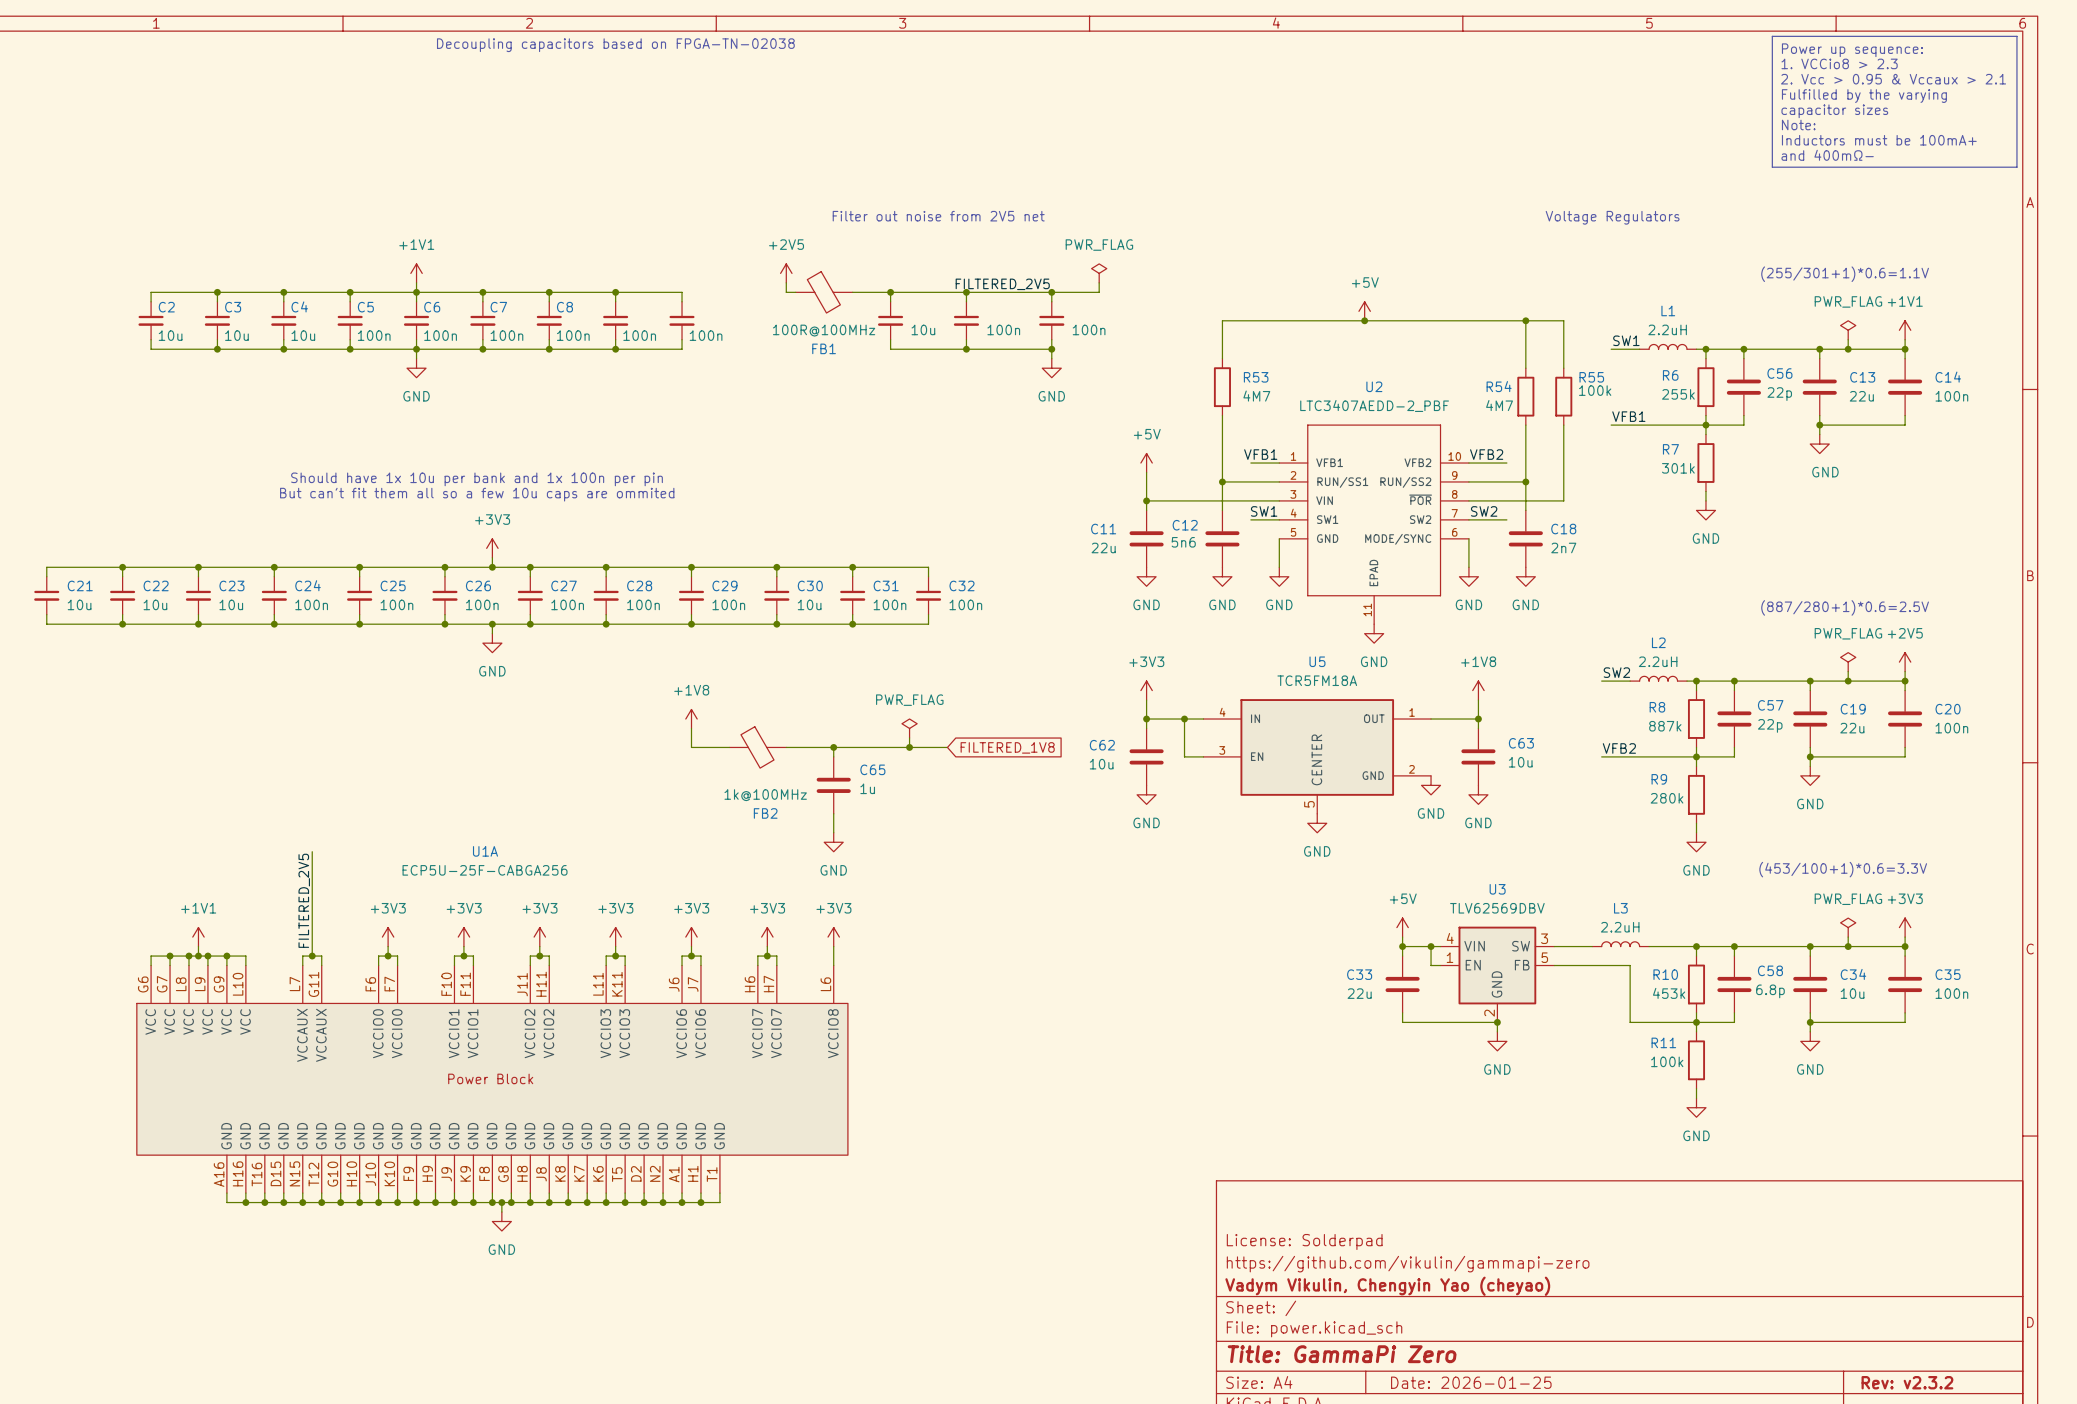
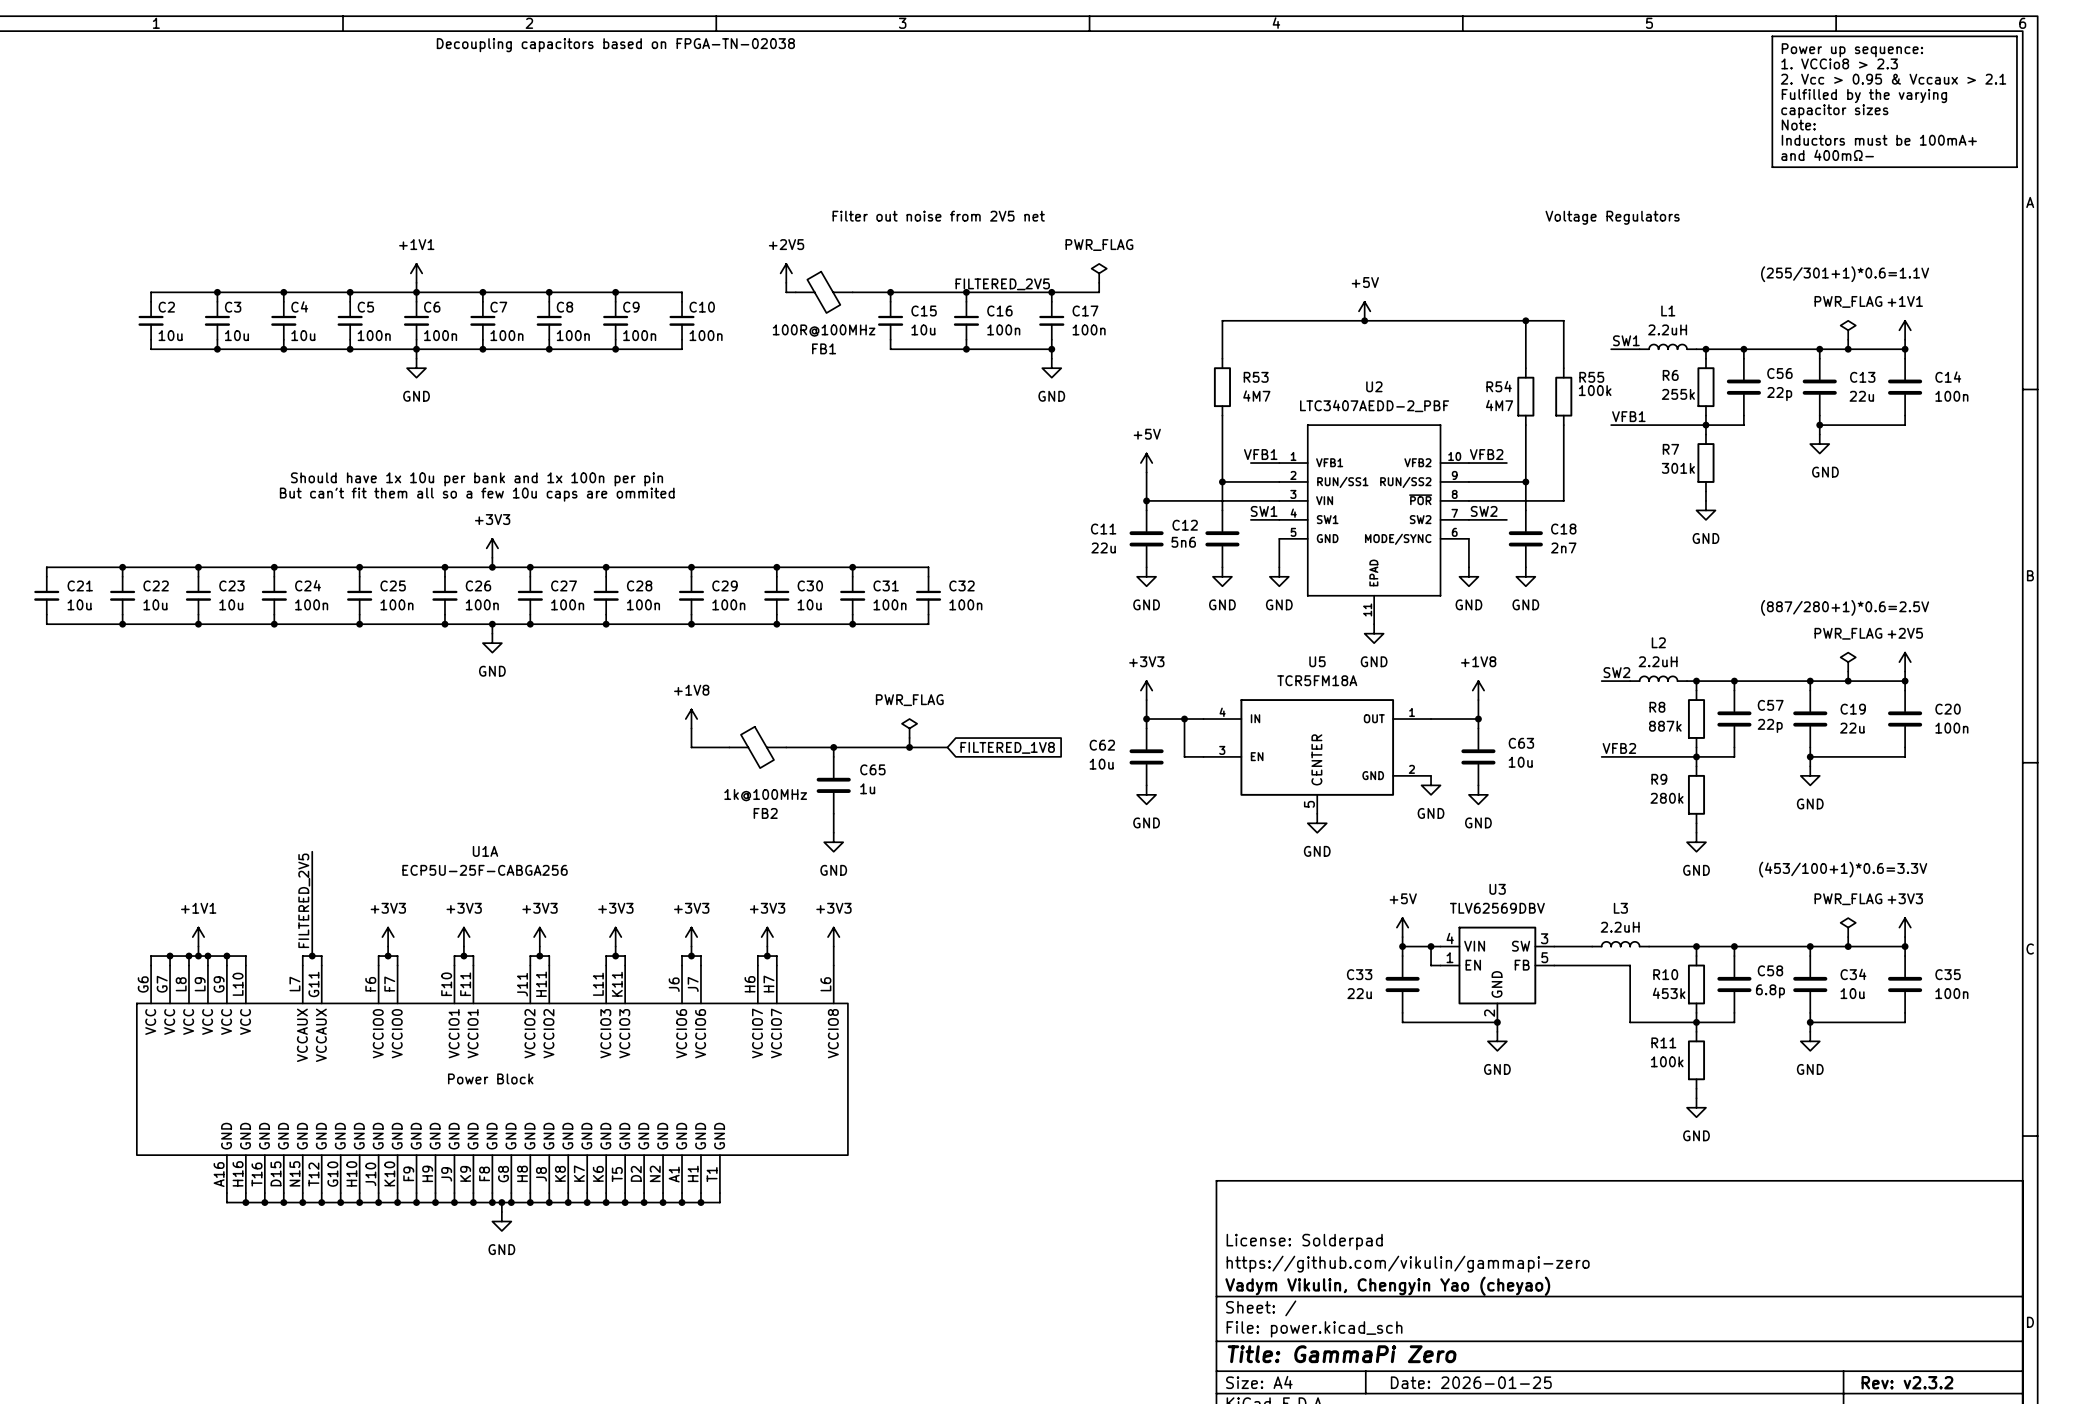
C9 name: none -> C9 (631, 307)
C10 name: none -> C10 (702, 307)
C15 name: none -> C15 (924, 311)
C16 name: none -> C16 (999, 311)
C17 name: none -> C17 (1085, 311)

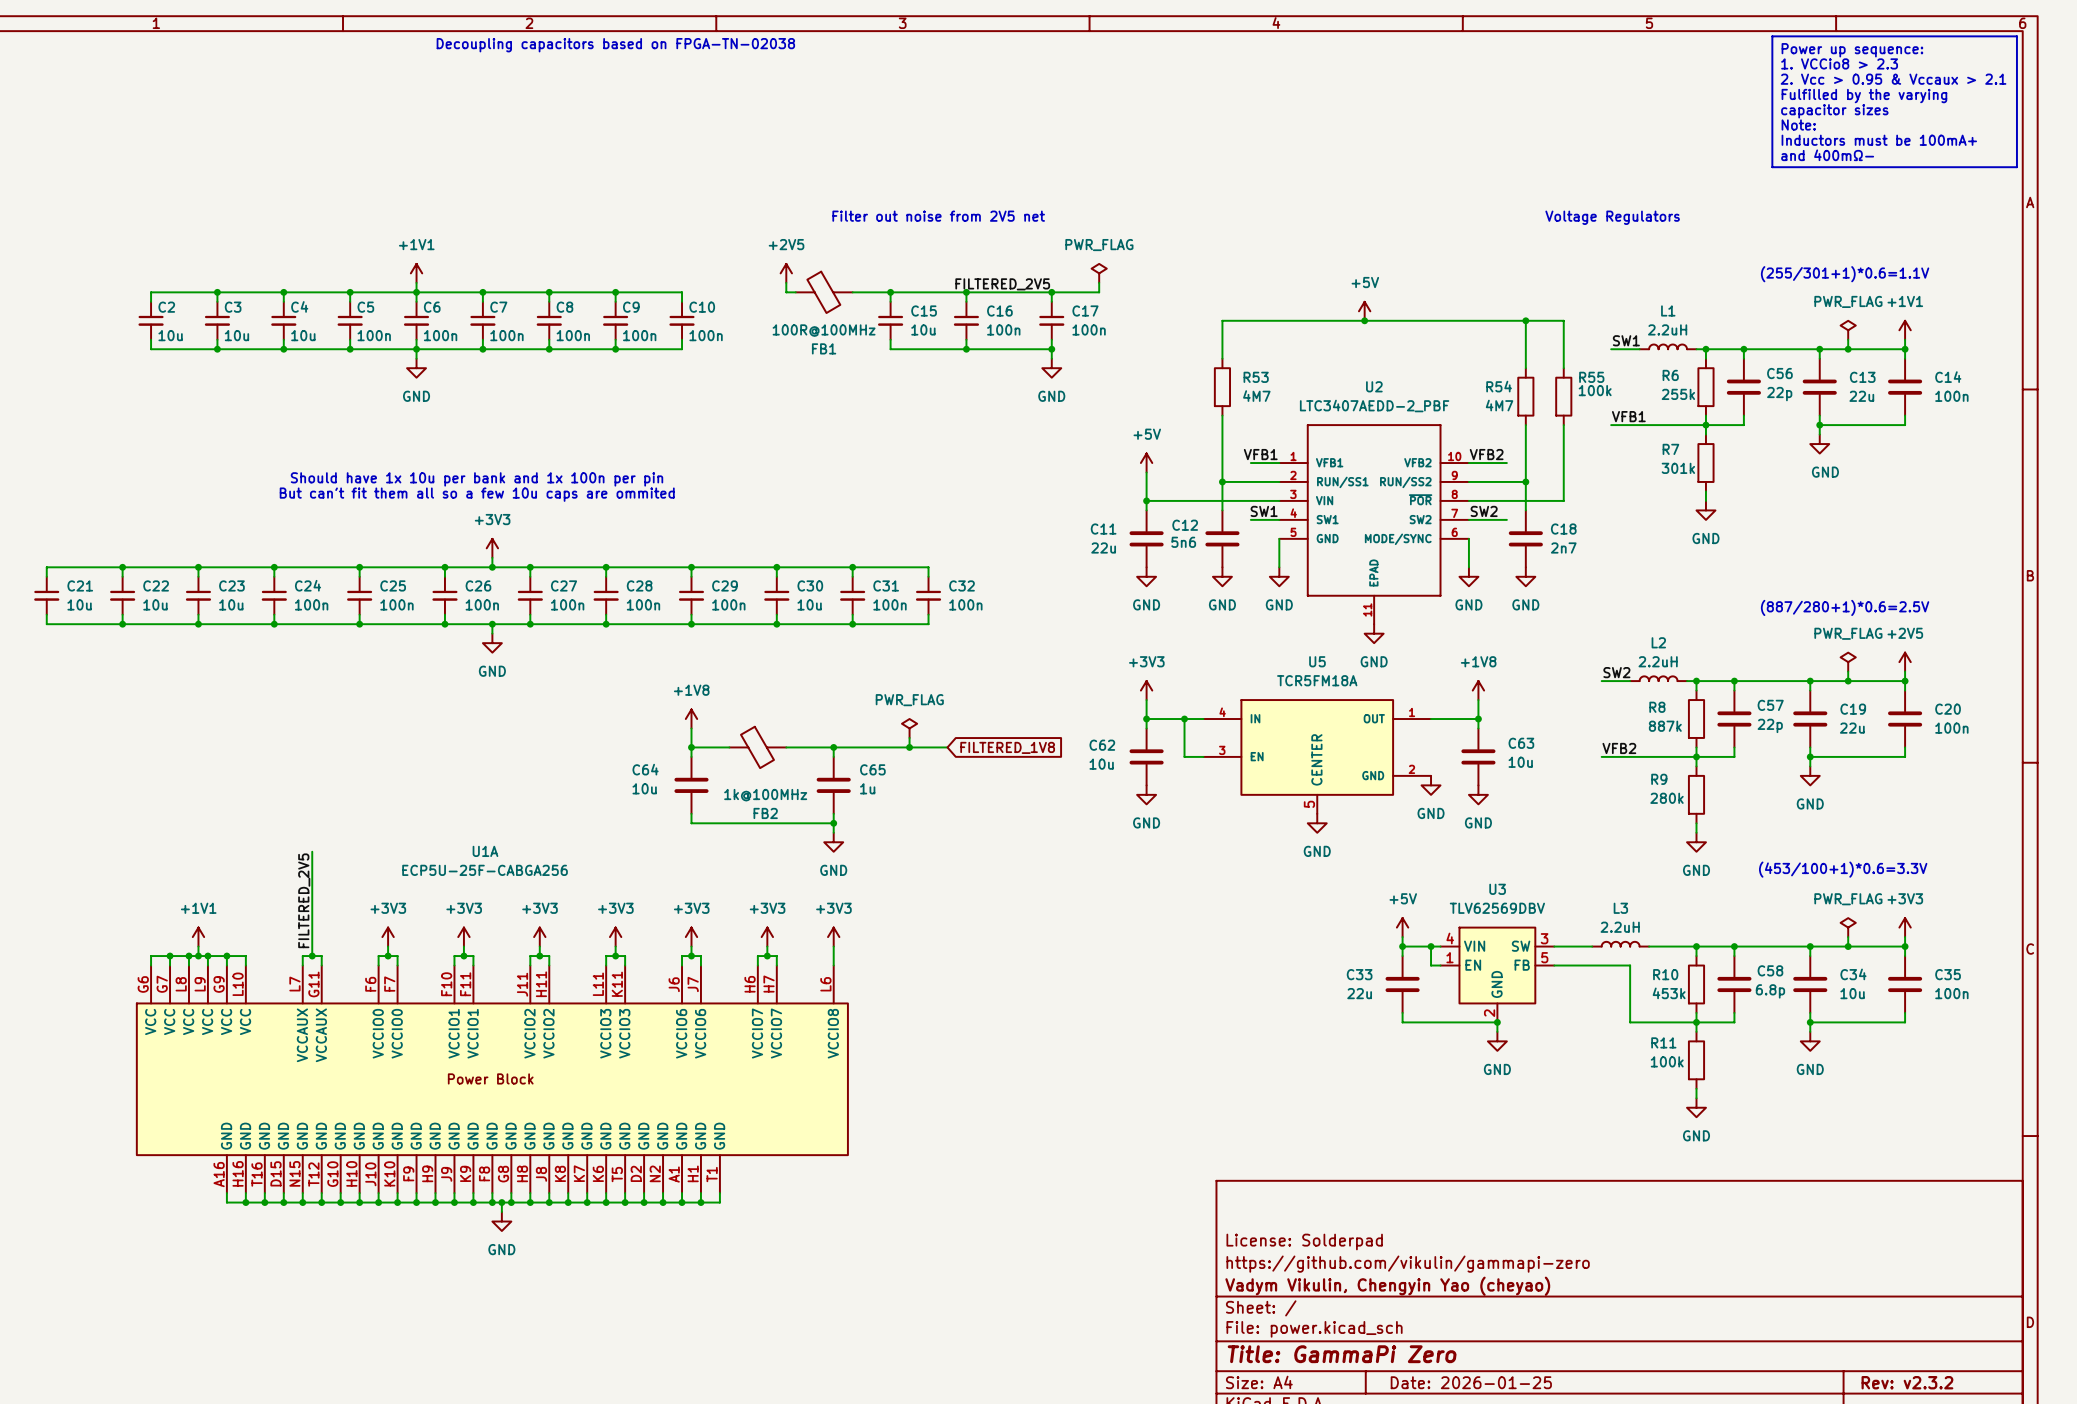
wire: none -> (691, 747) (691, 756)
junction: none -> (691, 747)
C64: none -> 10u (691, 785)
wire: none -> (691, 813) (691, 823) (833, 823)
junction: none -> (833, 823)

